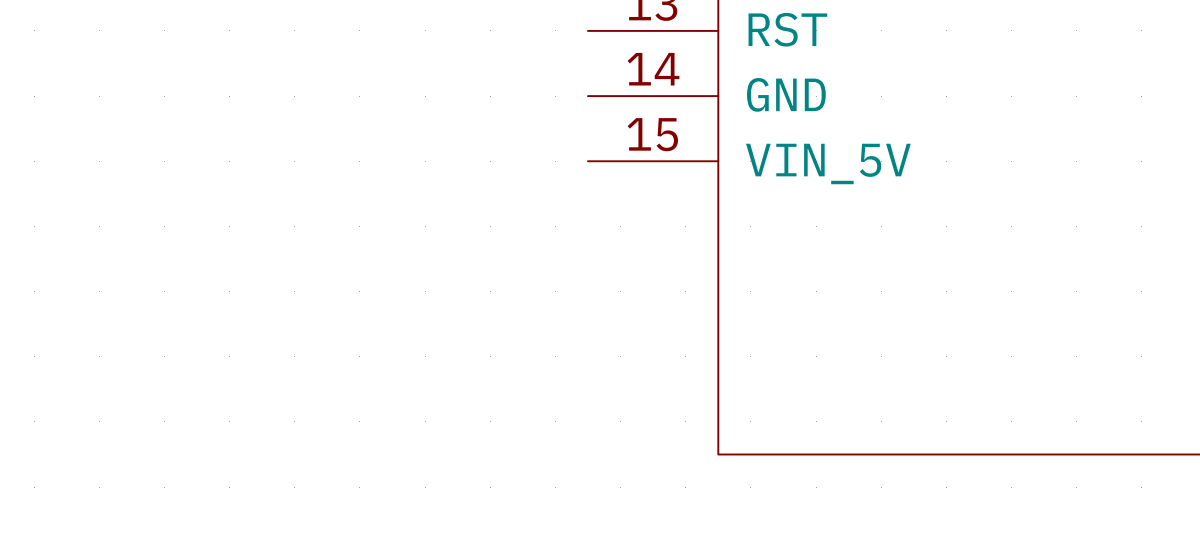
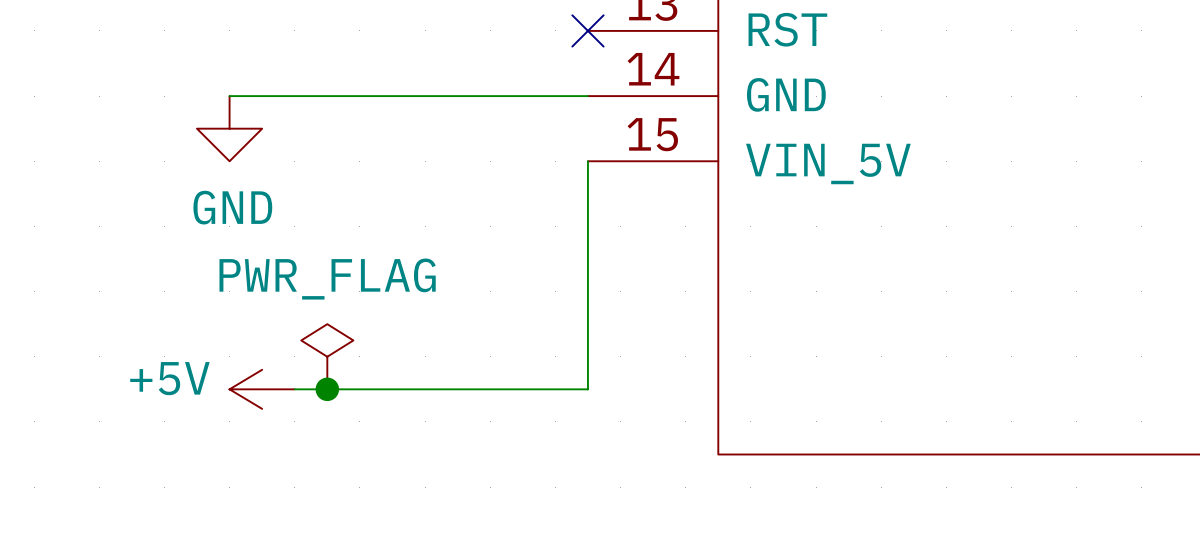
no-connect mark: none -> (587, 30)
wire: none -> (229, 96) (587, 96)
power symbol: none -> GND (229, 128)
wire: none -> (587, 161) (587, 389) (294, 389)
power symbol: none -> PWR_FLAG (327, 356)
power symbol: none -> +5V (262, 389)
junction: none -> (327, 389)

